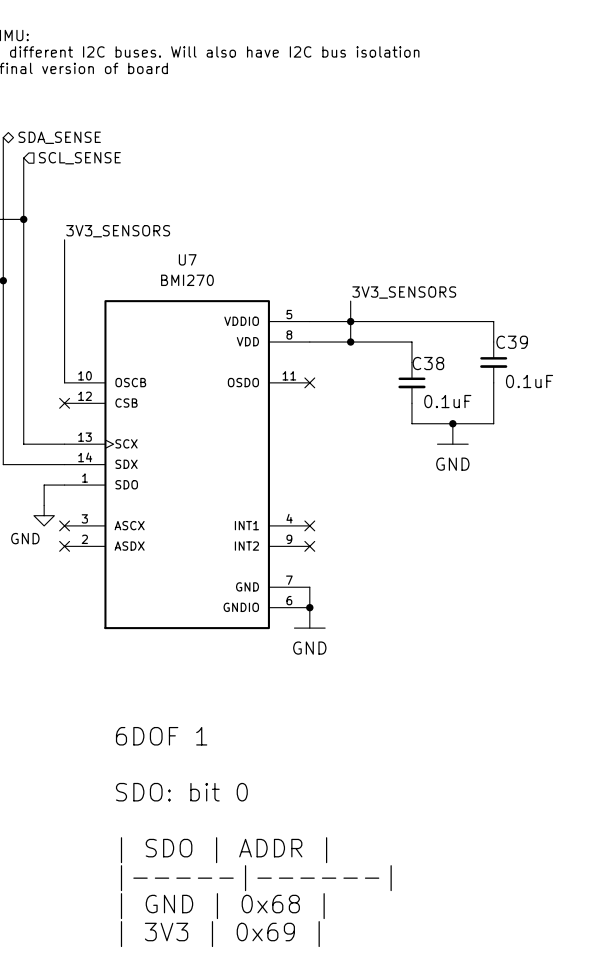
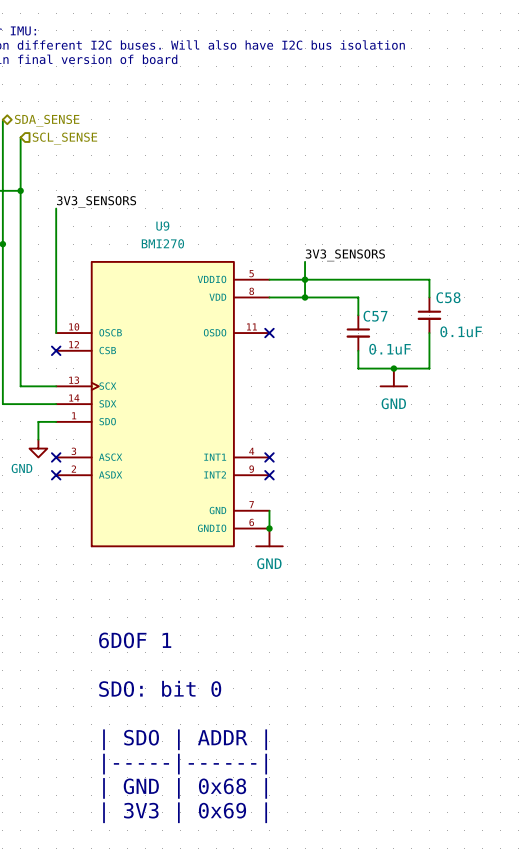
U7 name: U7 (187, 259) -> U9 (162, 226)
C39 name: C39 (512, 342) -> C58 (448, 297)
C38 name: C38 (428, 363) -> C57 (375, 316)

